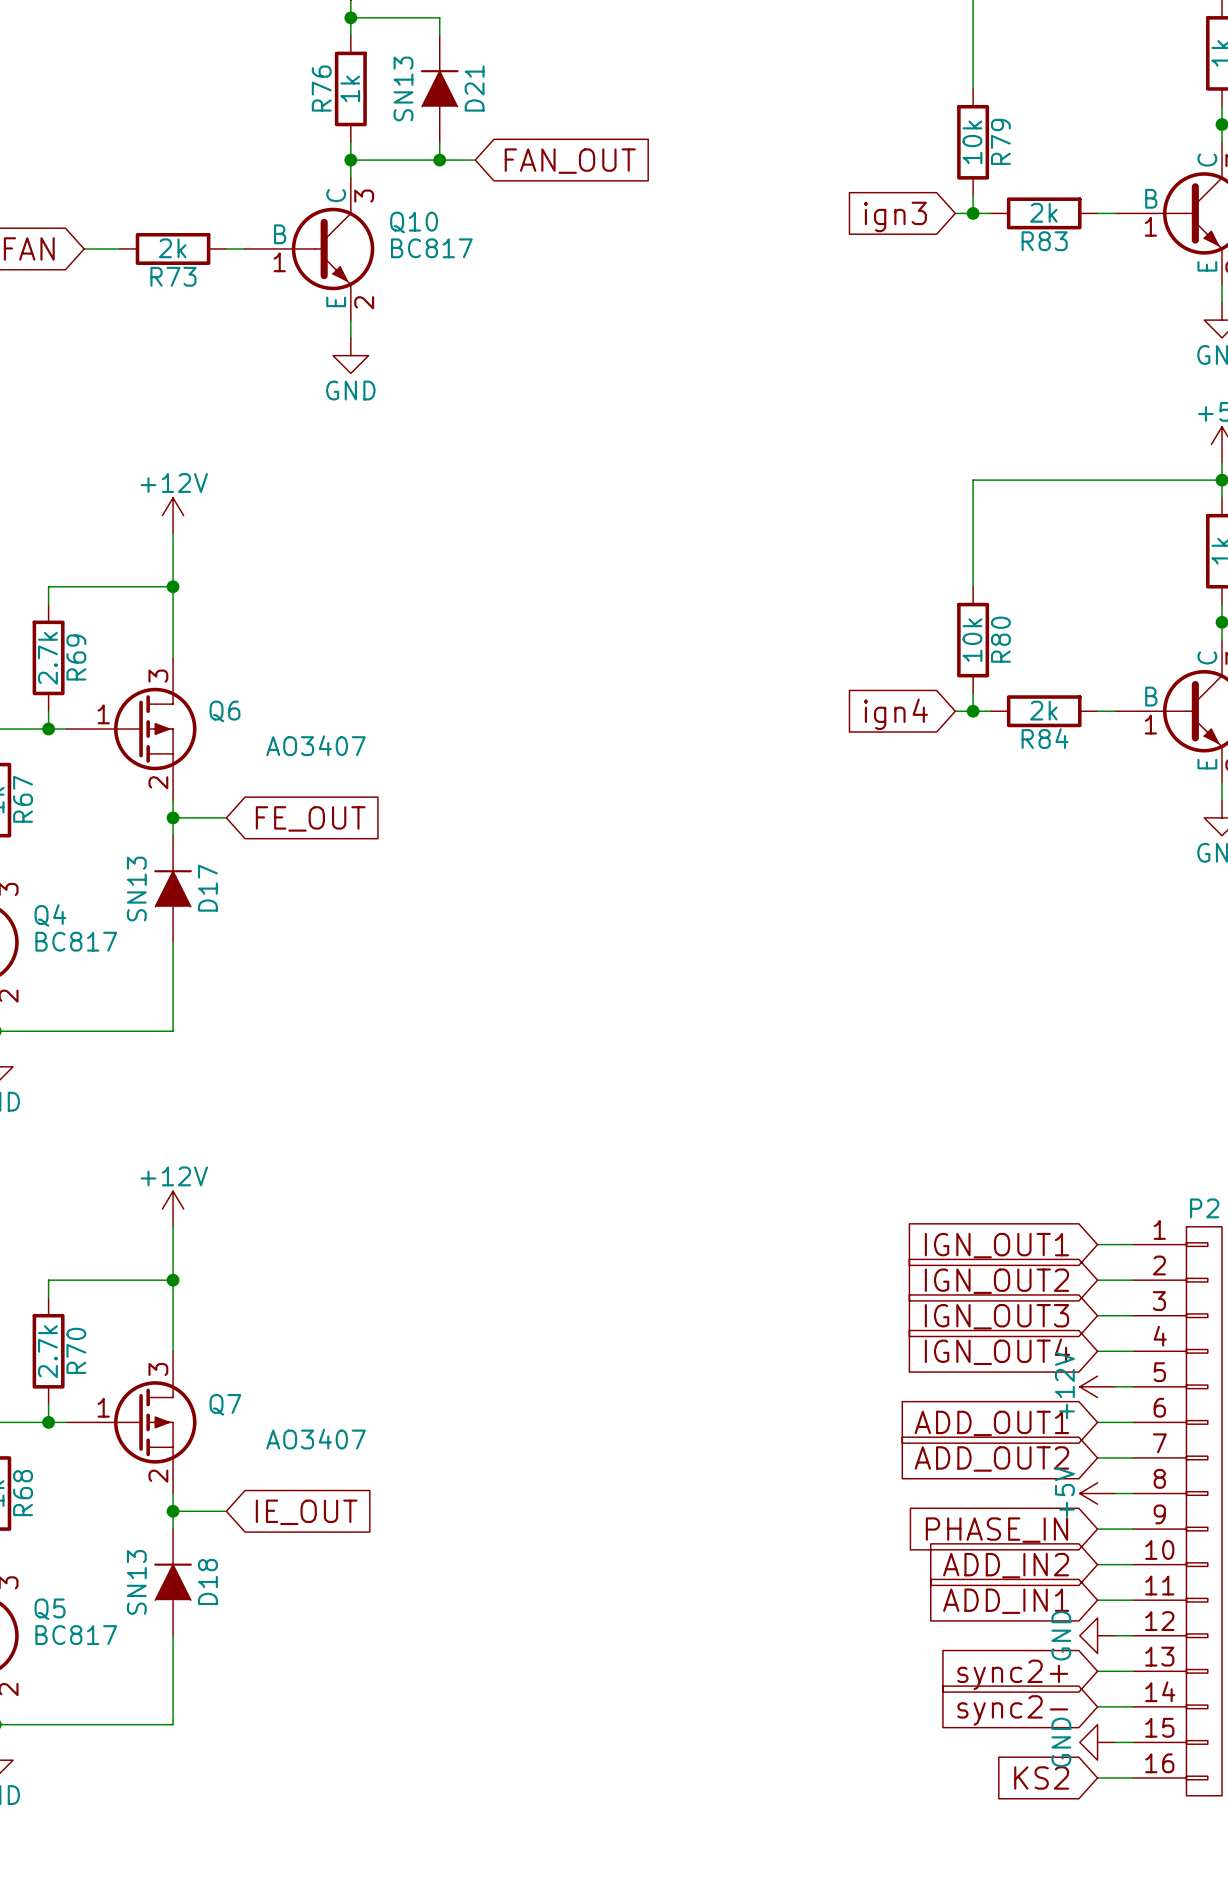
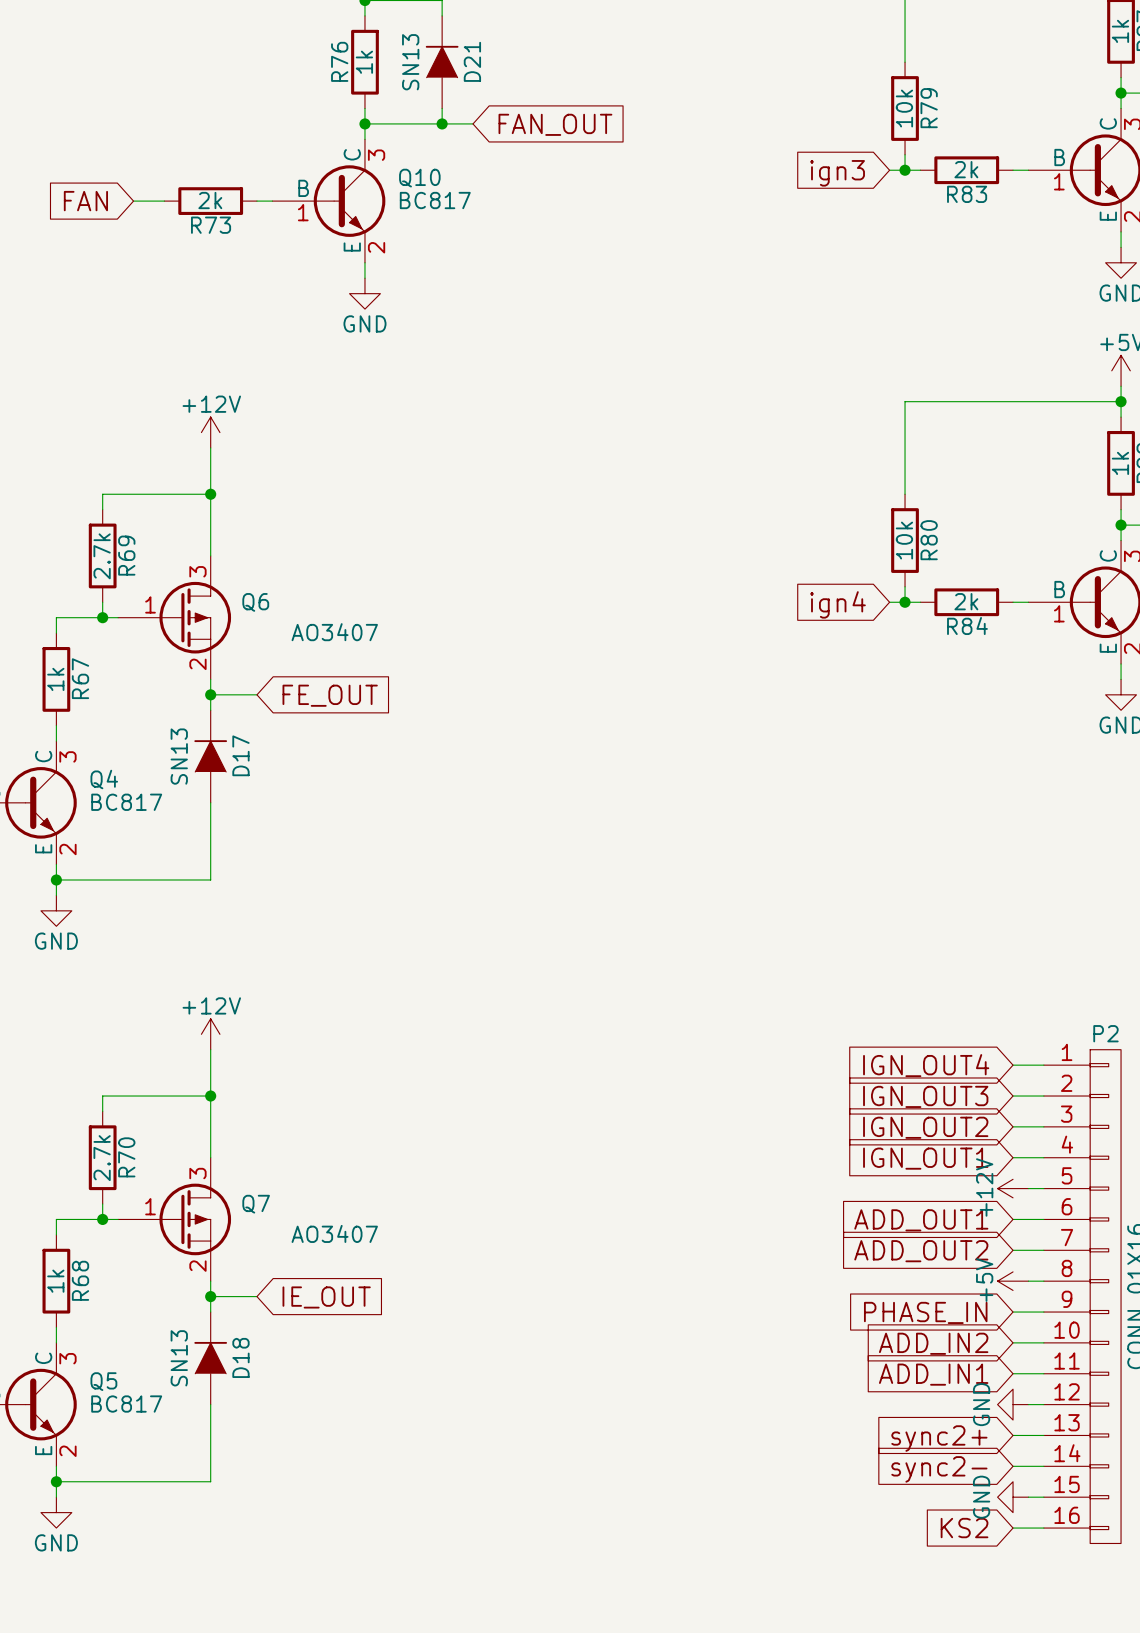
global label: IGN_OUT1 (996, 1245) -> IGN_OUT4 (926, 1065)
global label: IGN_OUT2 (996, 1281) -> IGN_OUT3 (925, 1096)
global label: IGN_OUT3 (996, 1316) -> IGN_OUT2 (925, 1127)
global label: IGN_OUT4 (997, 1351) -> IGN_OUT1 (925, 1158)

